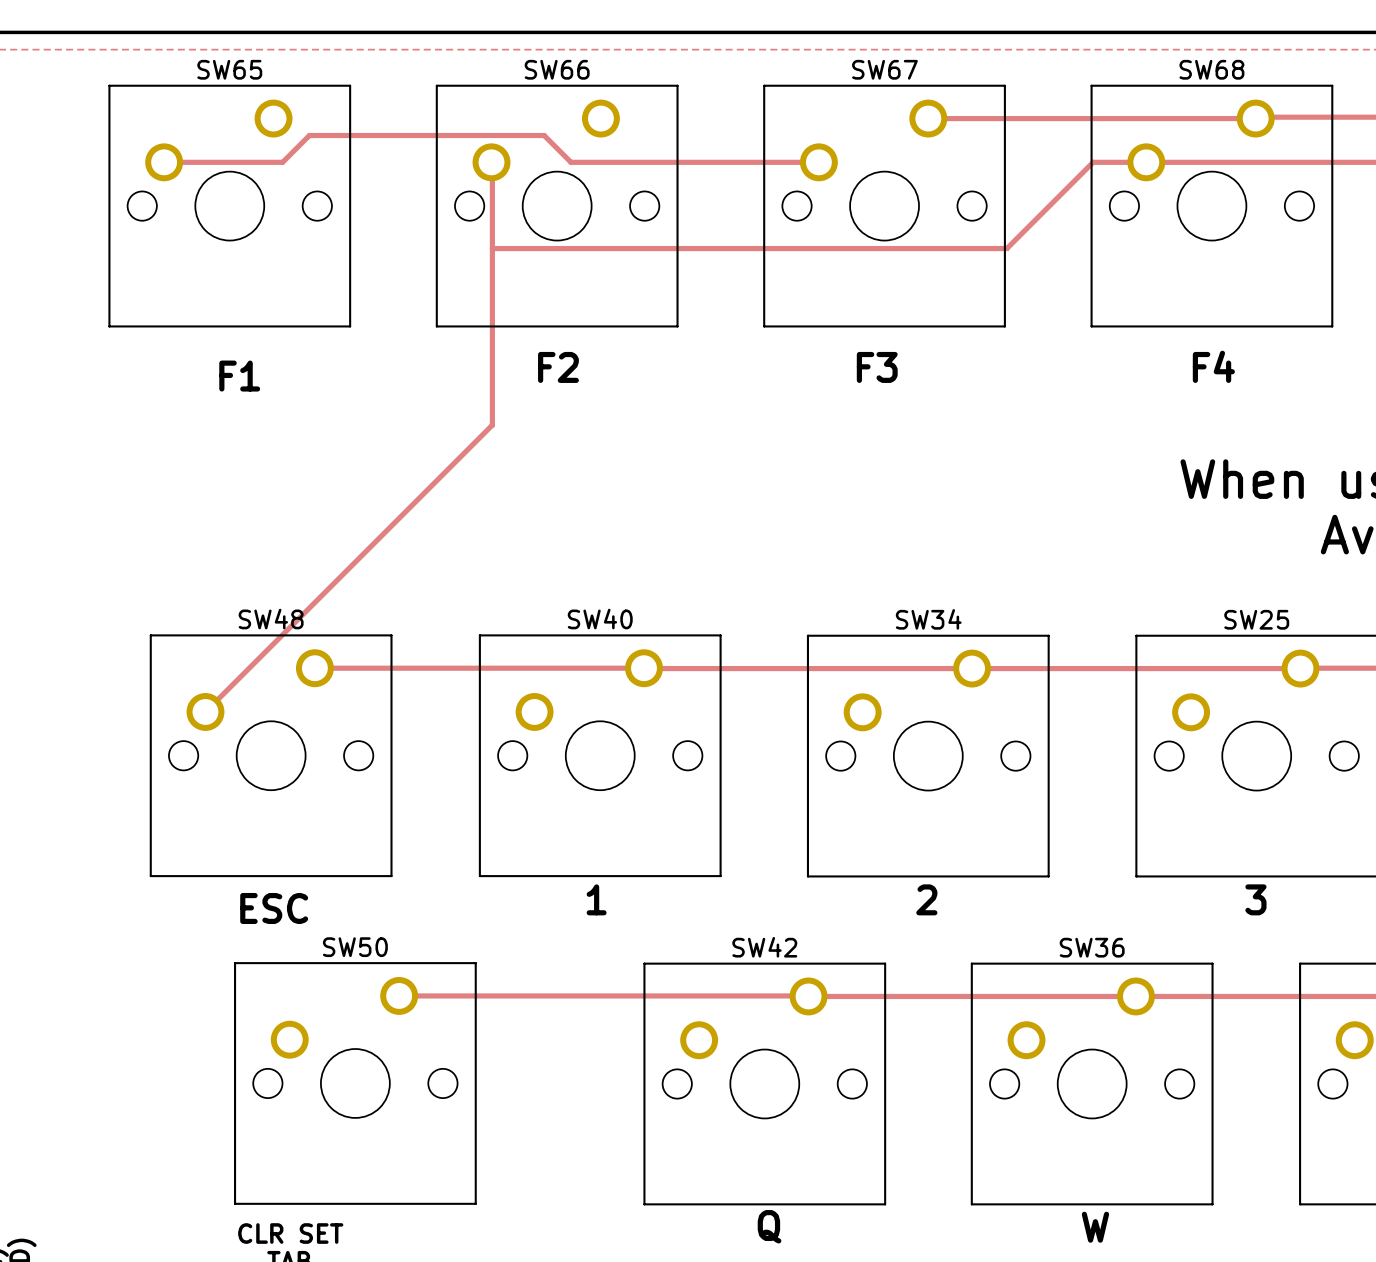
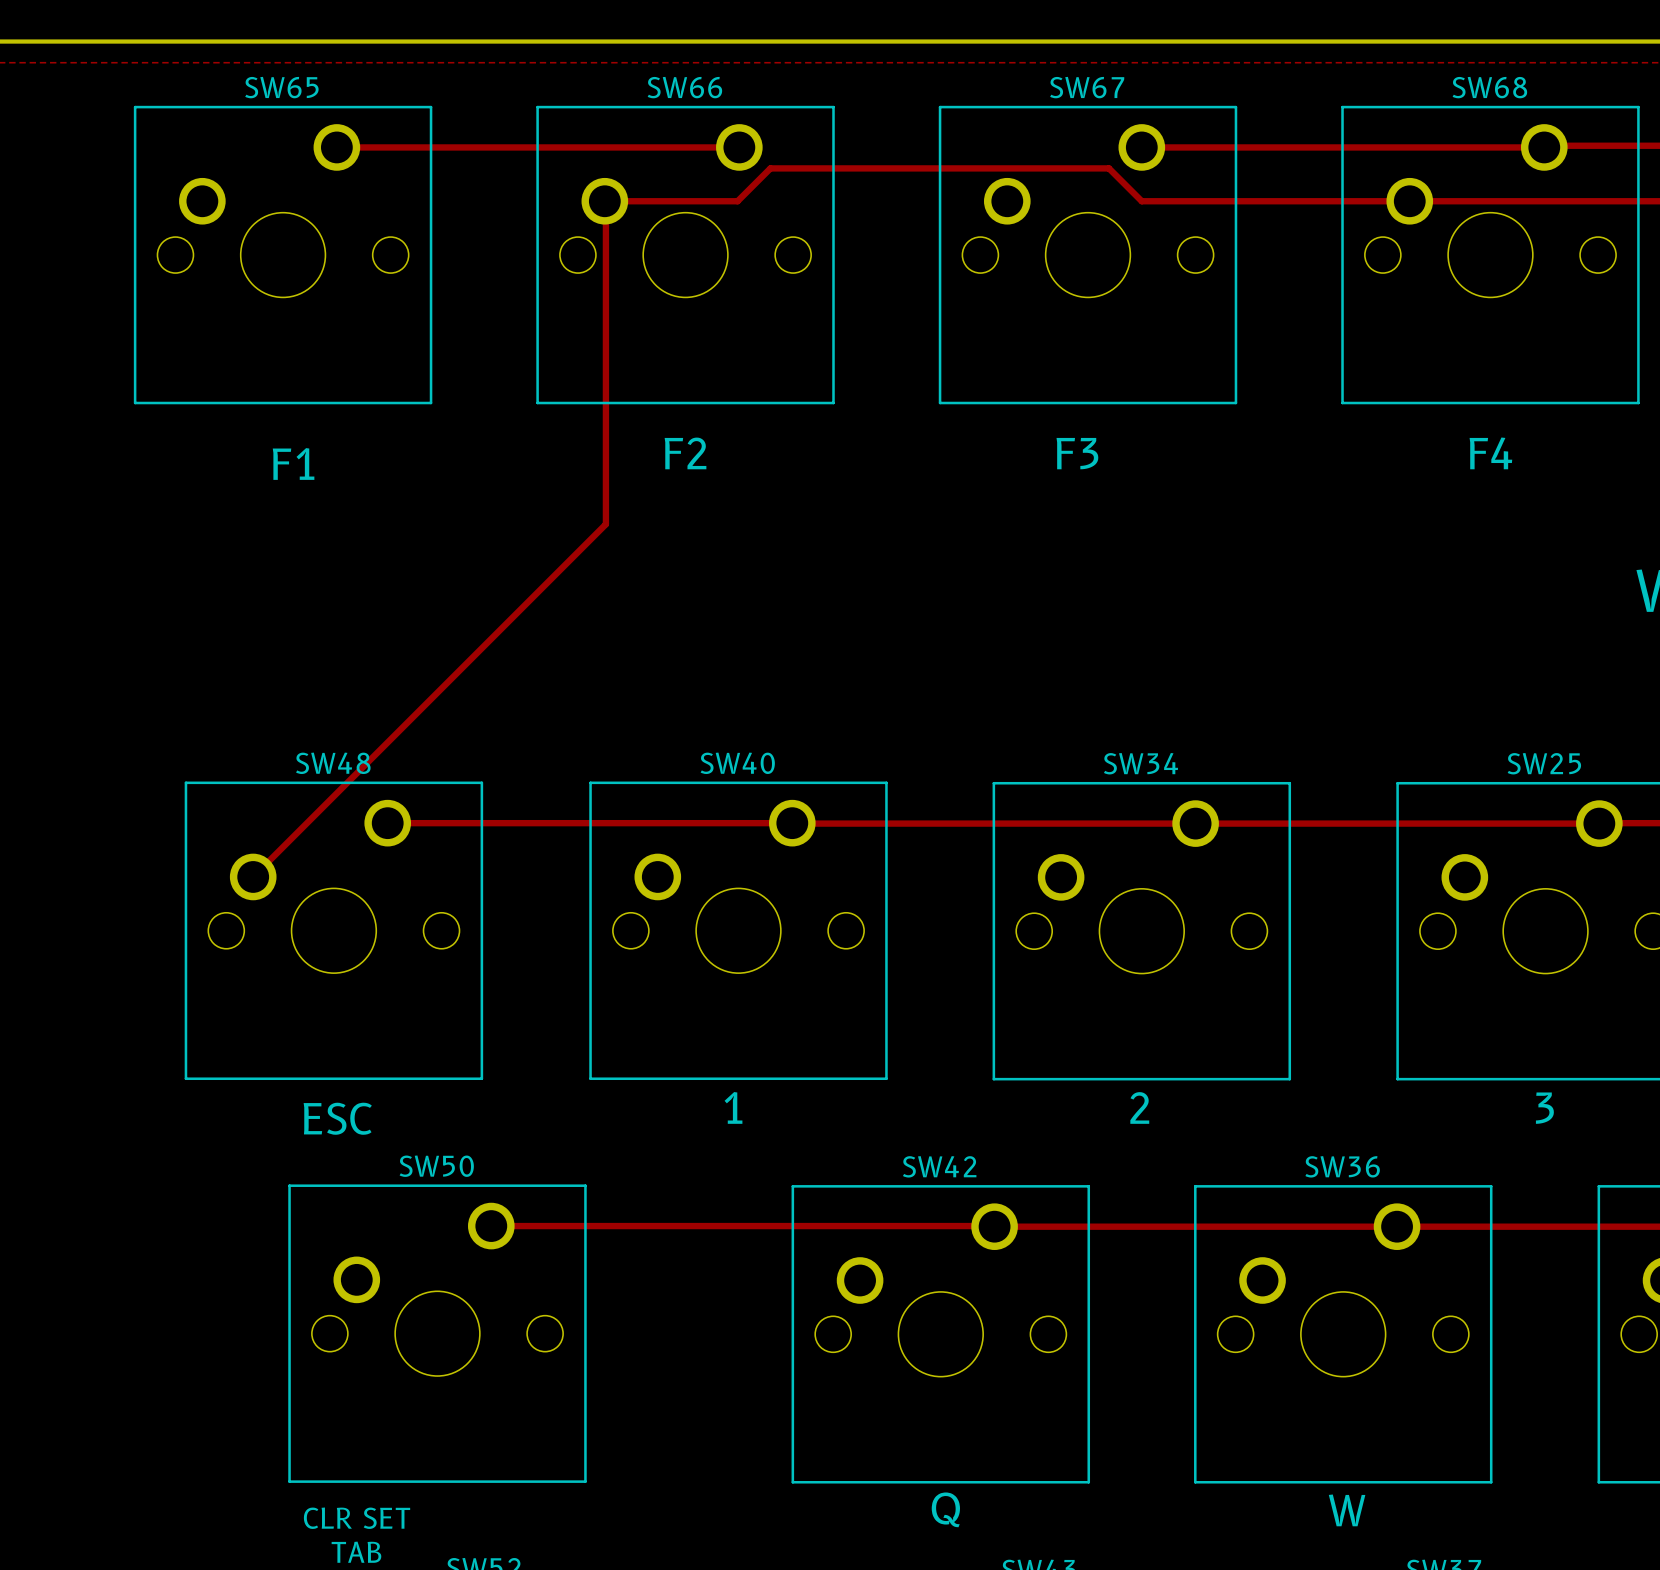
track: none -> (336, 147) (739, 147)
track: (164, 162) (282, 162) (309, 135) (544, 135) (571, 162) -> (604, 201) (702, 201)
track: (599, 162) (818, 162) -> none
track: (1093, 162) (1006, 248) (492, 248) -> (1344, 201) (1141, 201) (1108, 168) (770, 168) (737, 201)

